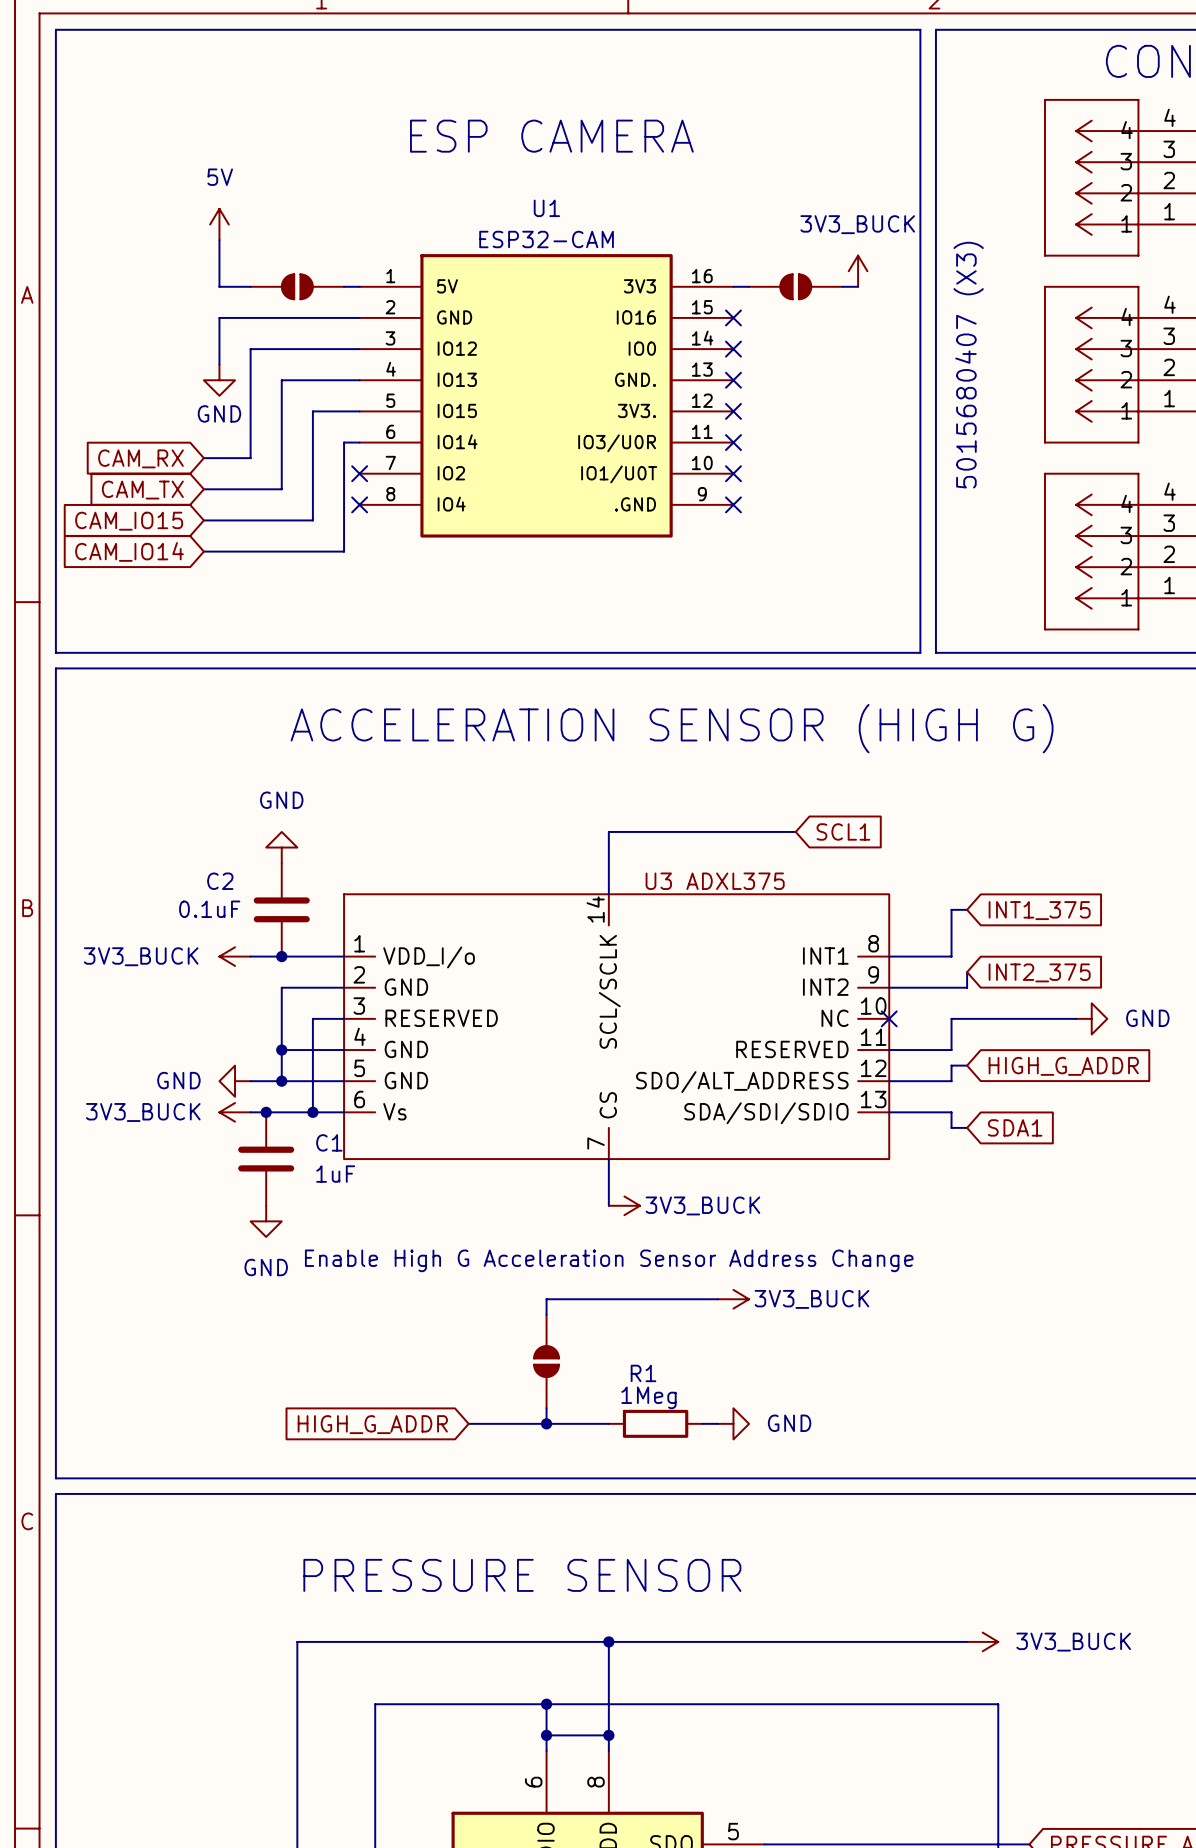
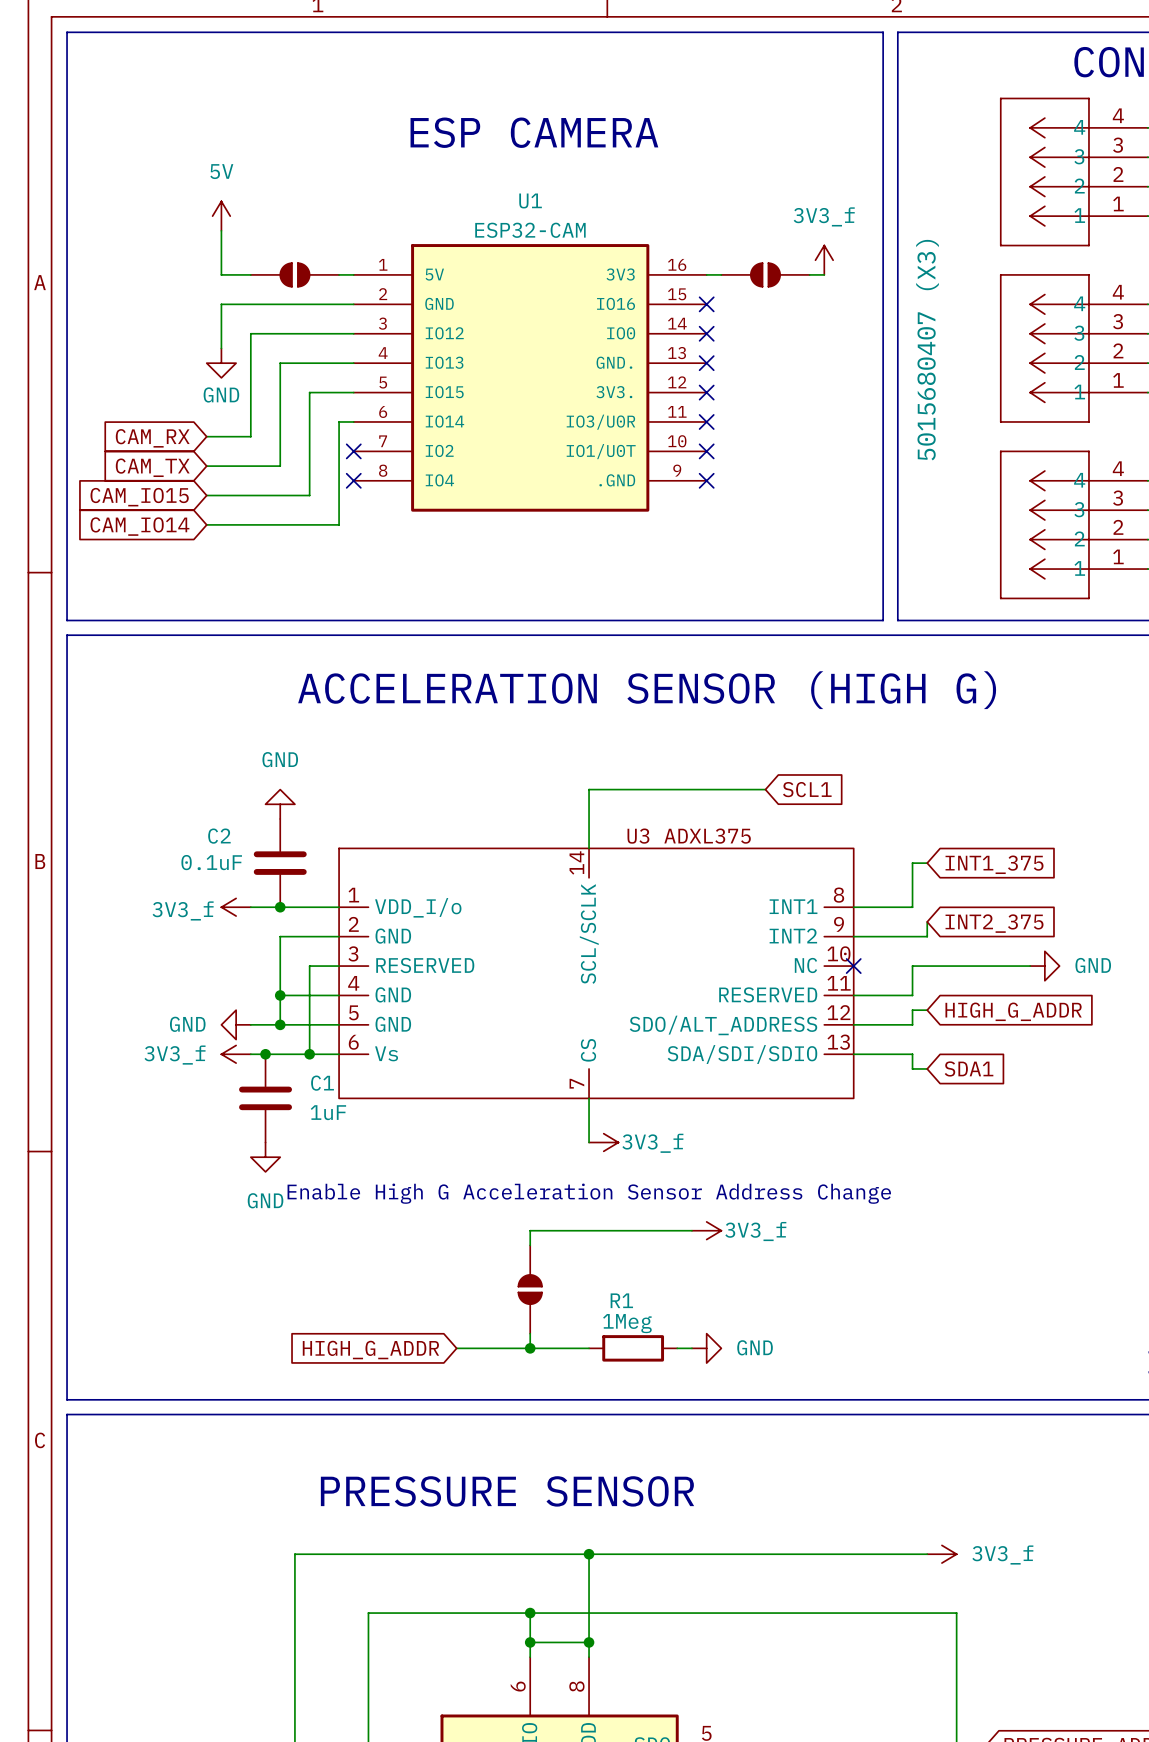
power symbol: 3V3_BUCK (858, 271) -> 3V3_f (824, 260)
power symbol: 3V3_BUCK (235, 956) -> 3V3_f (236, 907)
power symbol: 3V3_BUCK (235, 1112) -> 3V3_f (236, 1054)
power symbol: 3V3_BUCK (624, 1205) -> 3V3_f (603, 1142)
power symbol: 3V3_BUCK (733, 1299) -> 3V3_f (706, 1230)
power symbol: 3V3_BUCK (982, 1641) -> 3V3_f (941, 1554)

